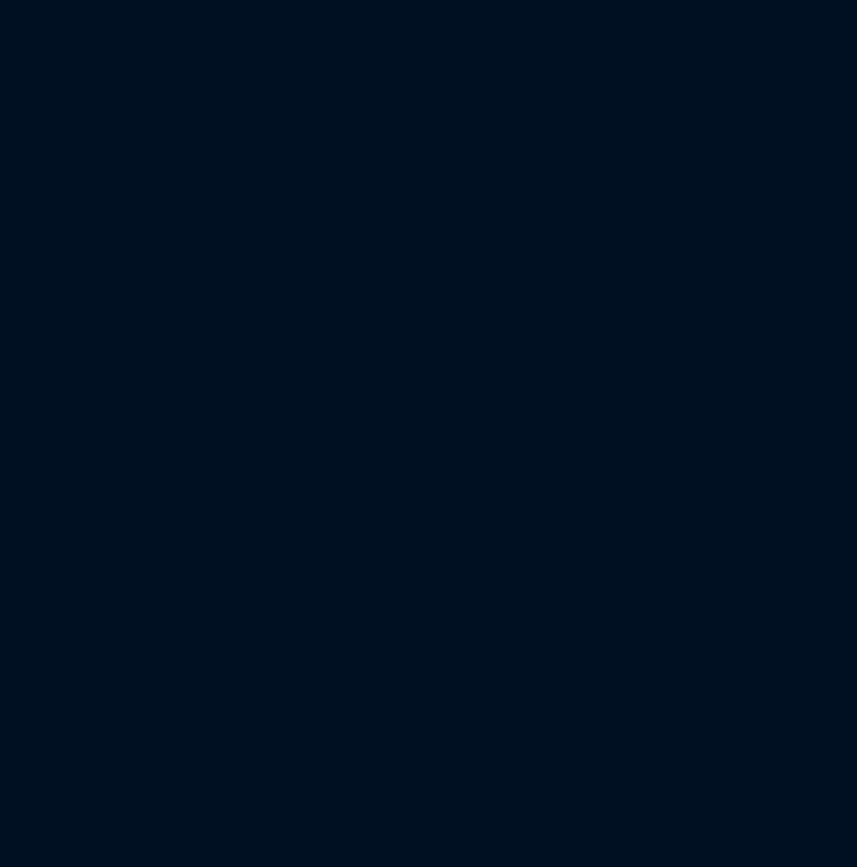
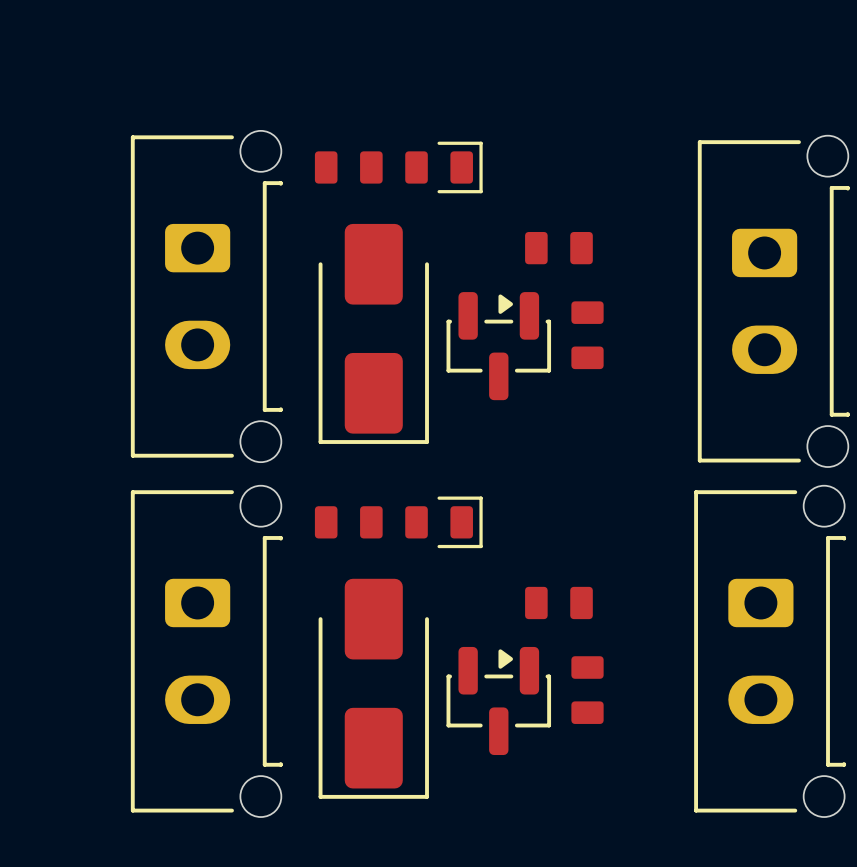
part: none -> (348, 167)
part: none -> (443, 167)
part: none -> (558, 248)
part: none -> (206, 296)
part: none -> (773, 301)
part: none -> (373, 333)
part: none -> (587, 335)
part: none -> (498, 346)
part: none -> (348, 522)
part: none -> (443, 522)
part: none -> (558, 602)
part: none -> (206, 651)
part: none -> (770, 651)
part: none -> (373, 688)
part: none -> (587, 690)
part: none -> (498, 700)

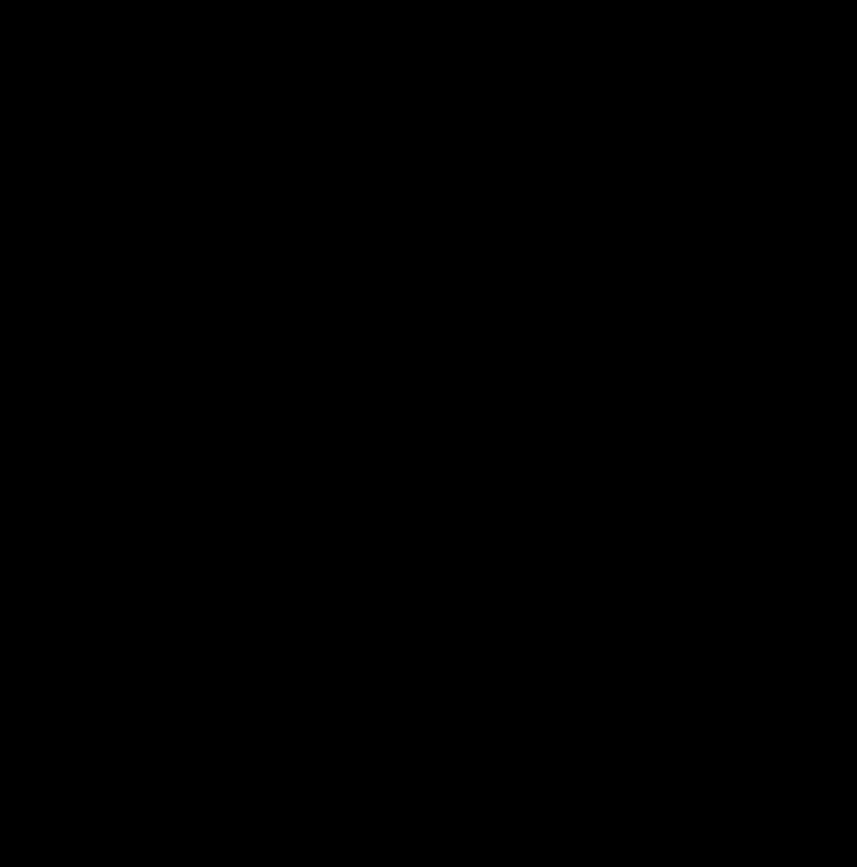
part: (348, 167) -> none
part: (443, 167) -> none
part: (558, 248) -> none
part: (206, 296) -> none
part: (773, 301) -> none
part: (373, 333) -> none
part: (587, 335) -> none
part: (498, 346) -> none
part: (348, 522) -> none
part: (443, 522) -> none
part: (558, 602) -> none
part: (206, 651) -> none
part: (770, 651) -> none
part: (373, 688) -> none
part: (587, 690) -> none
part: (498, 700) -> none

